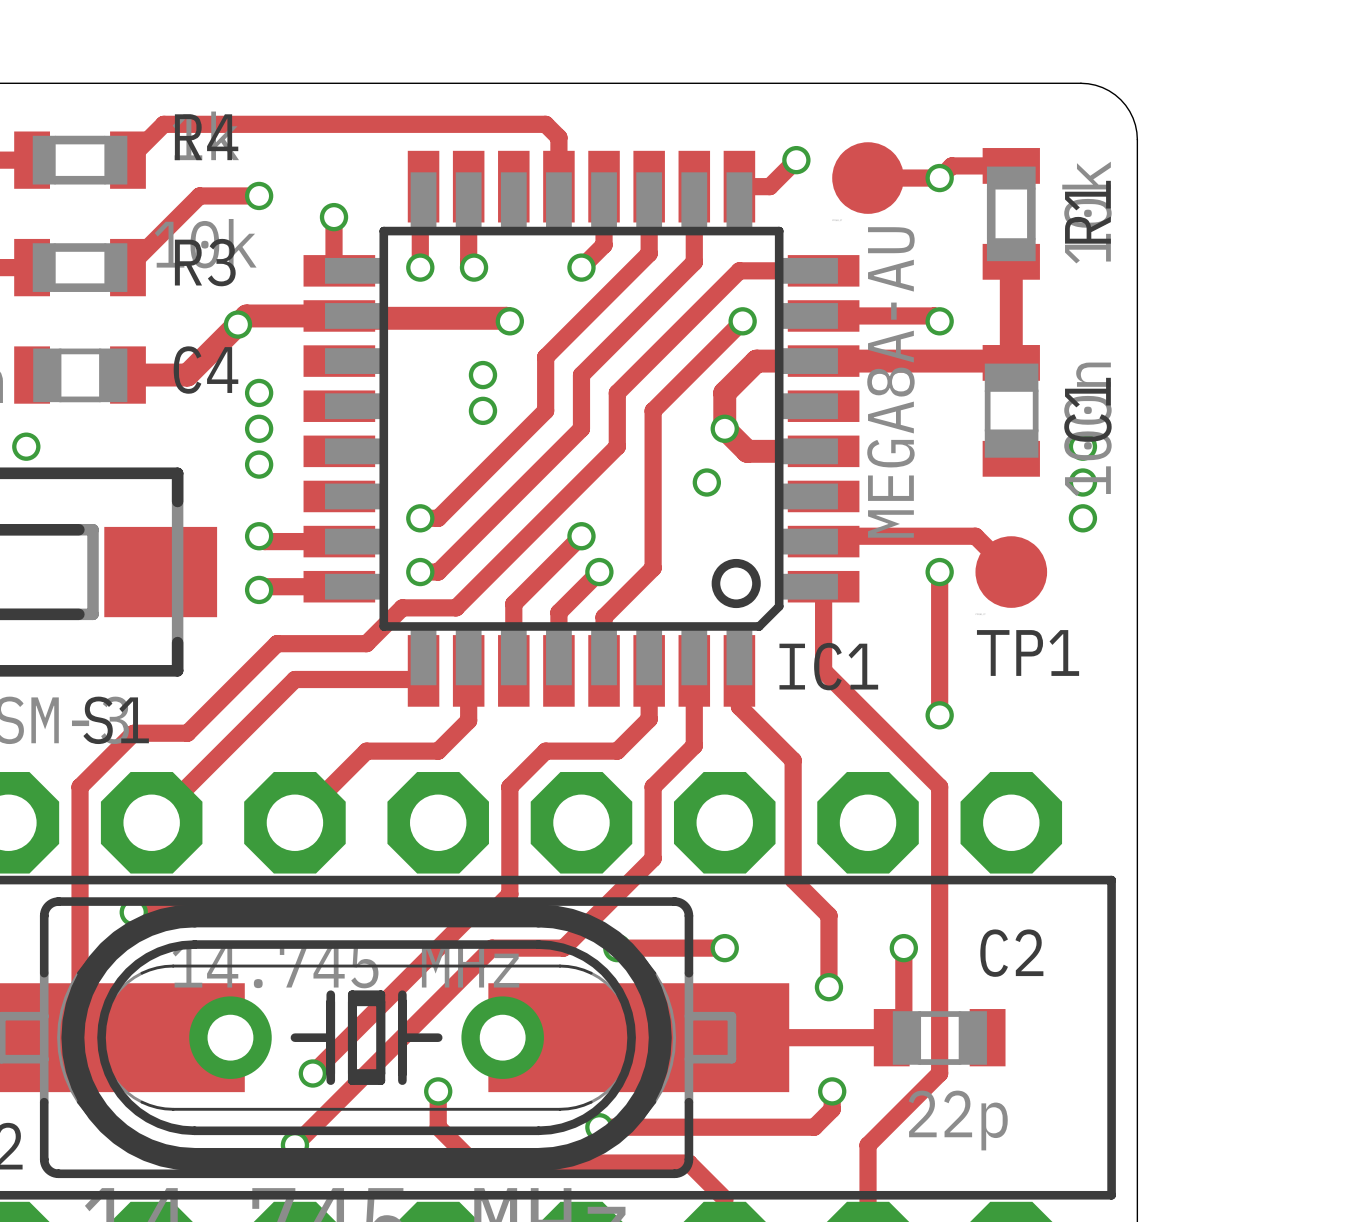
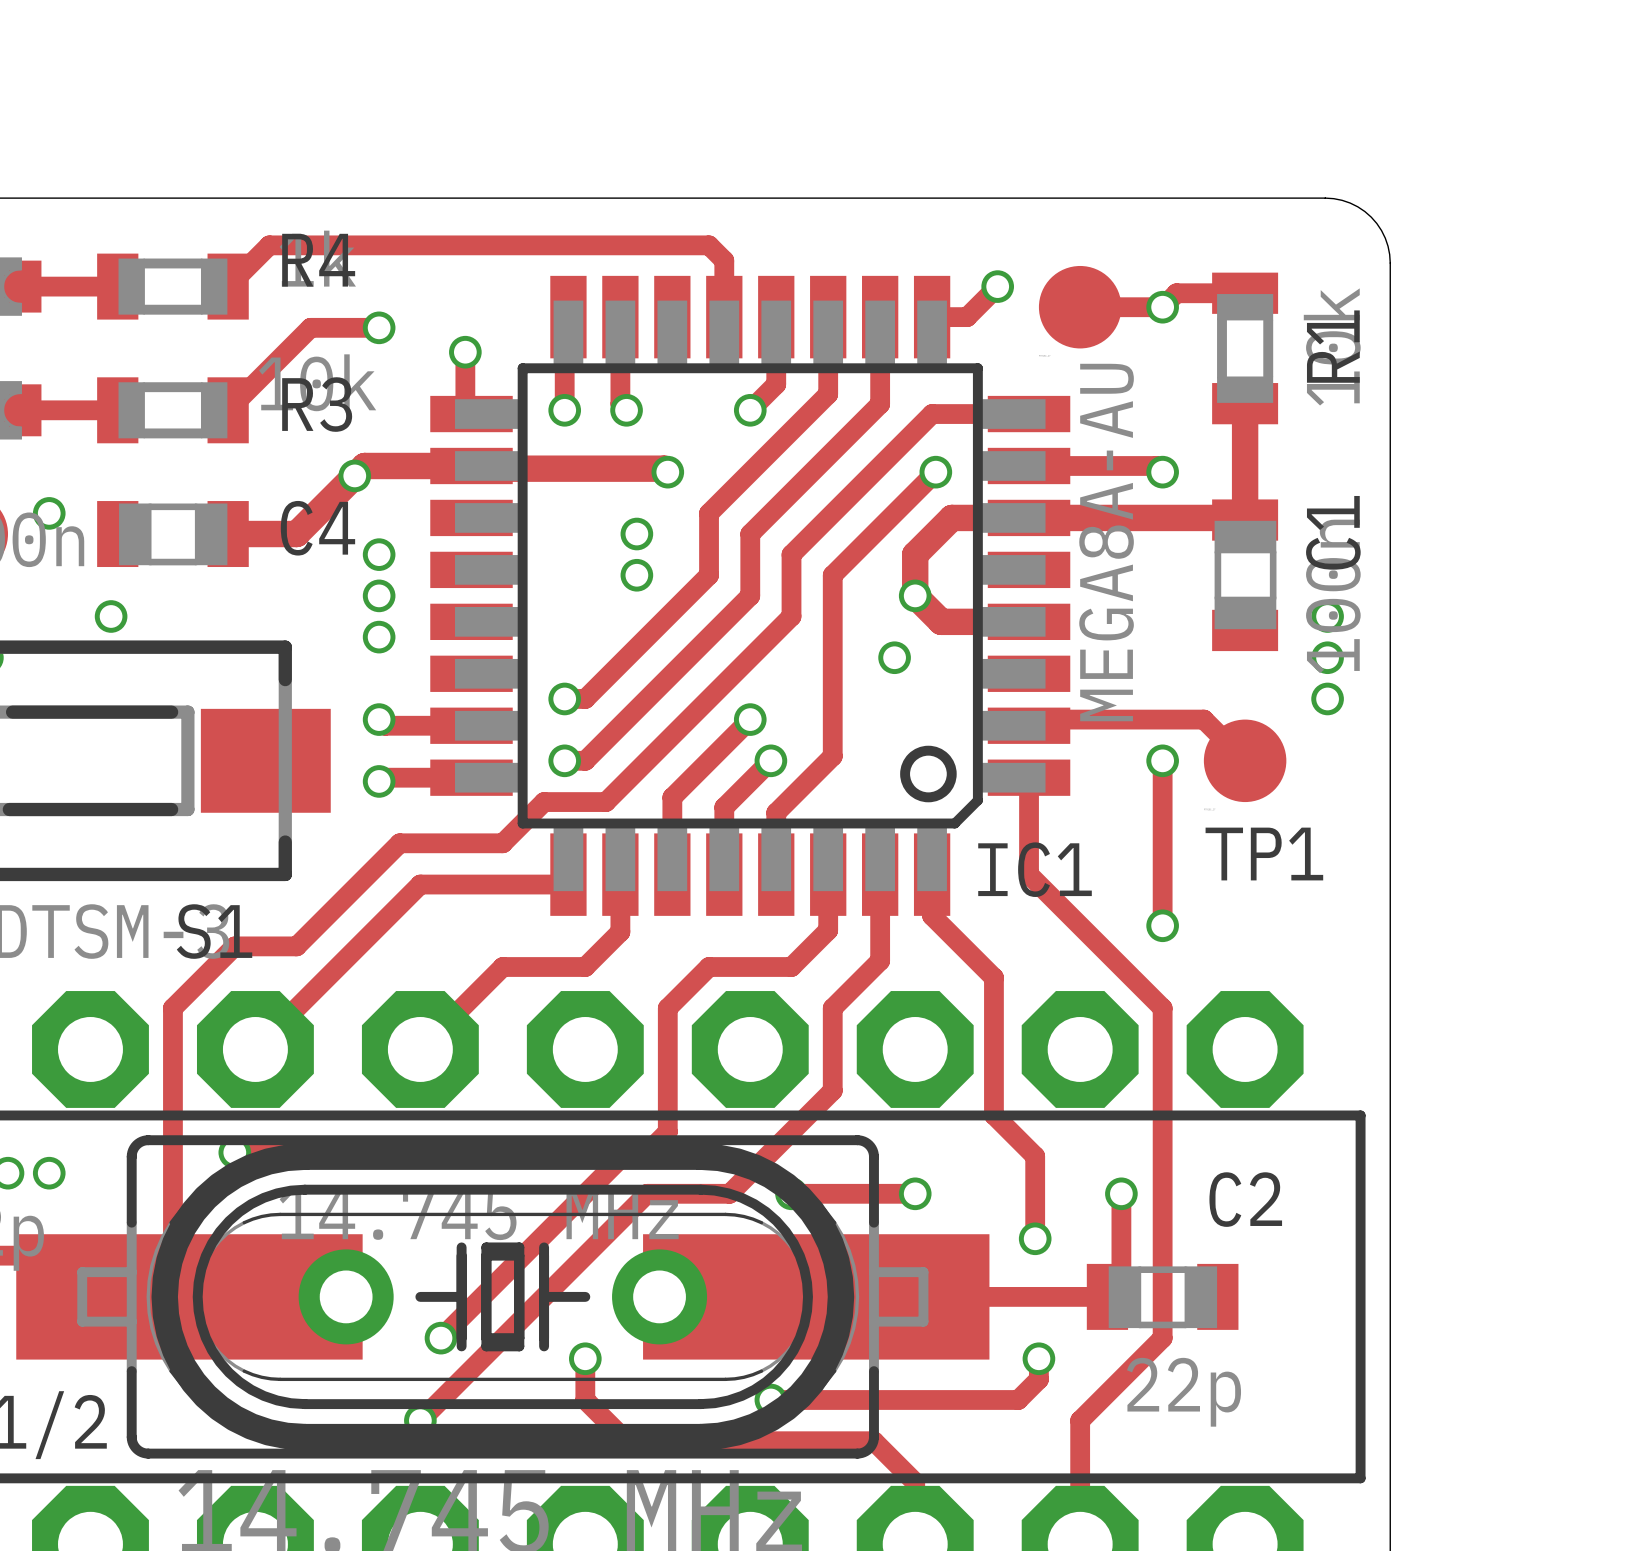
C1 name position: C1 (1087, 409) -> C1 (1333, 532)

